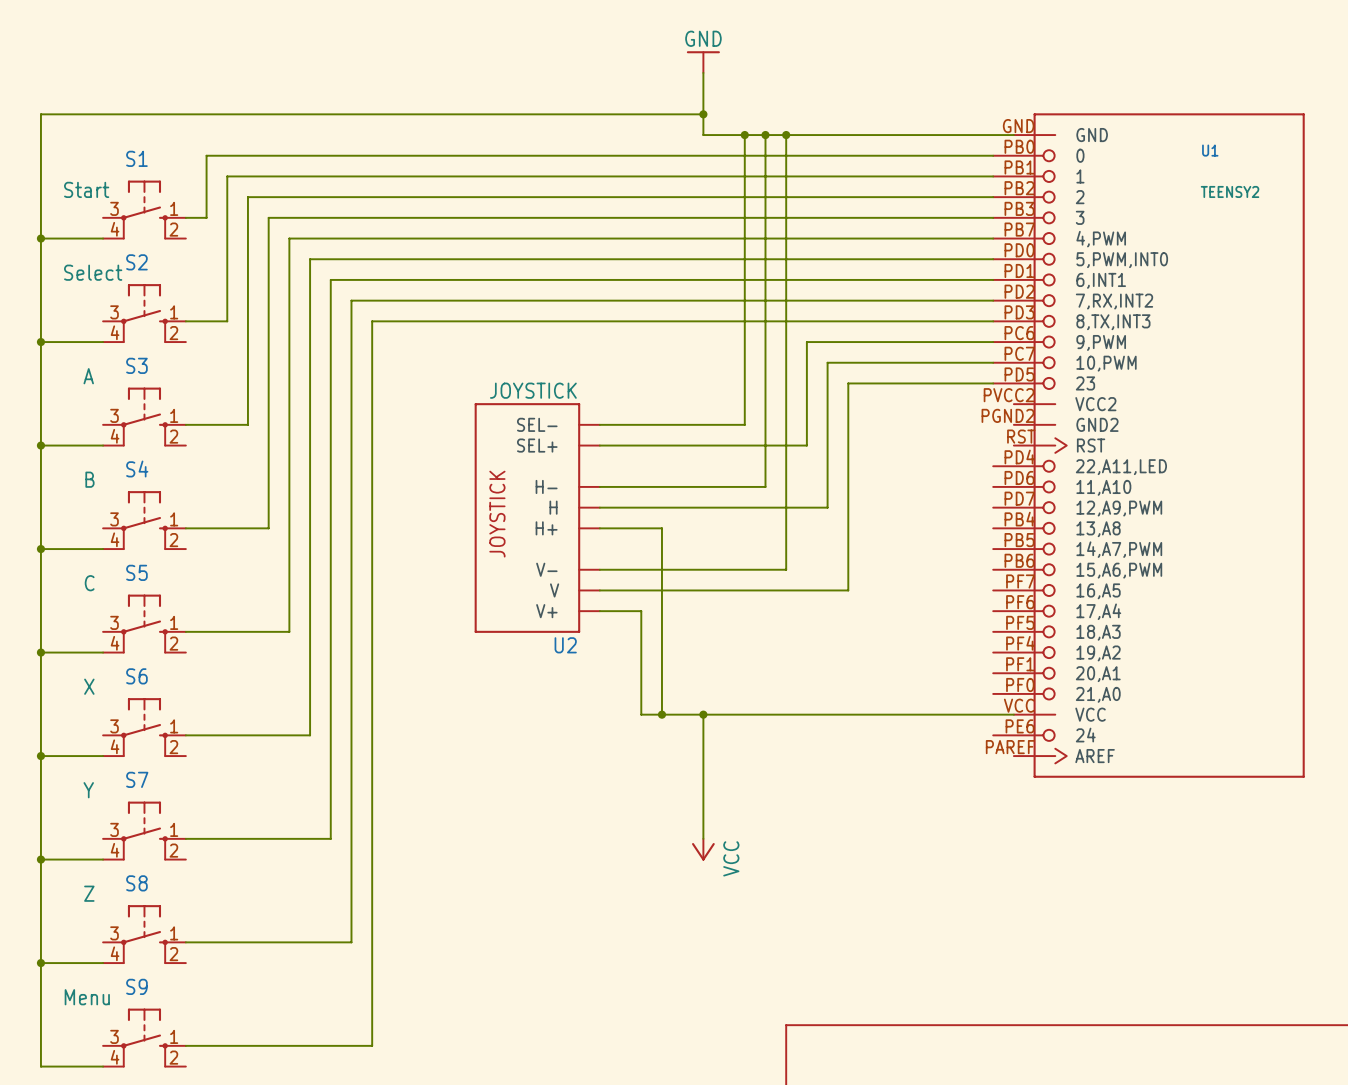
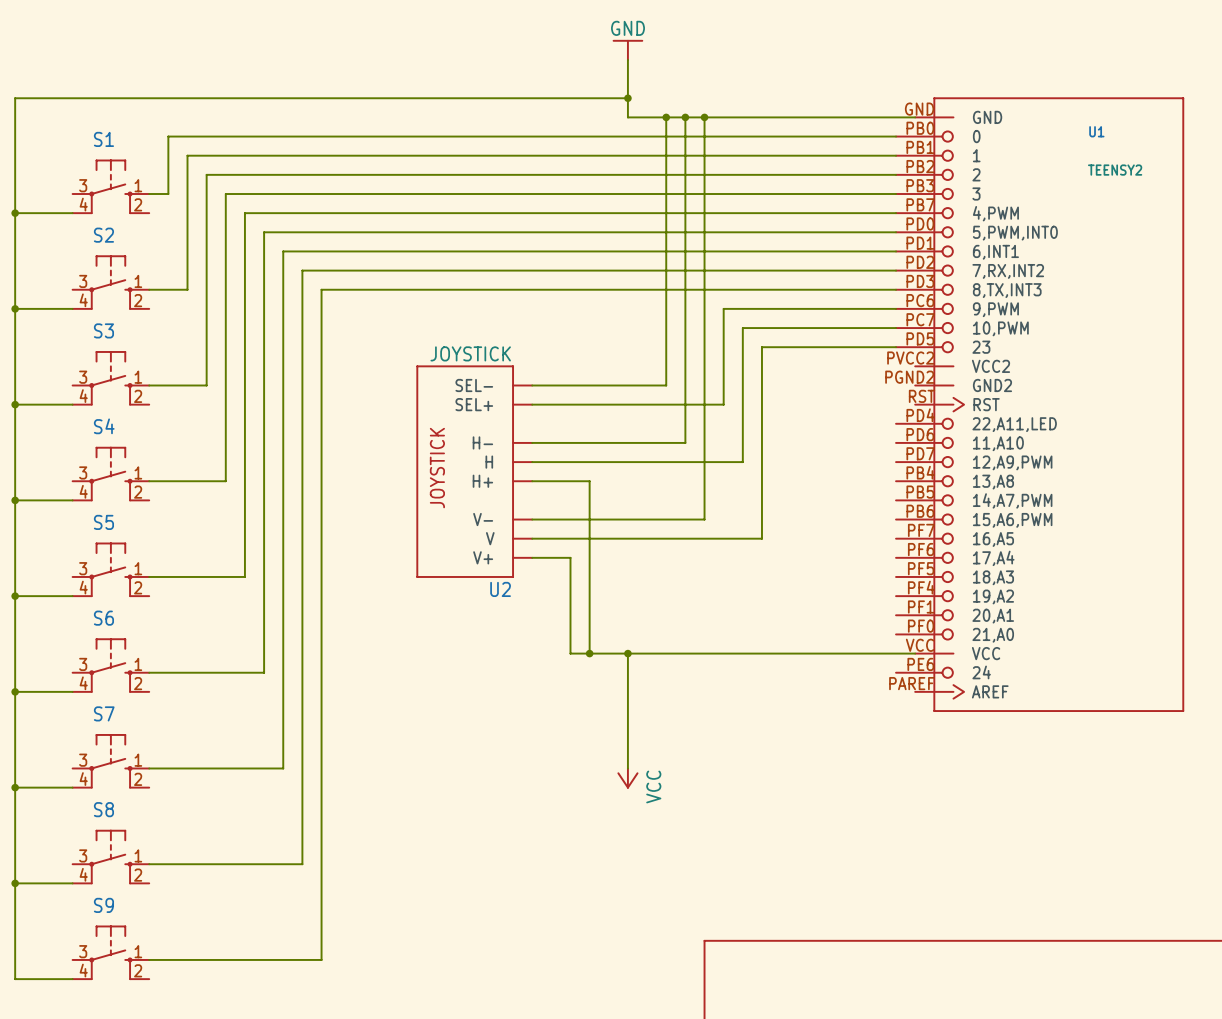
text: Start (86, 189) -> none
text: Select (93, 272) -> none
text: A (88, 376) -> none
text: B (89, 479) -> none
text: C (89, 583) -> none
text: X (89, 686) -> none
text: Y (88, 790) -> none
text: Z (89, 893) -> none
text: Menu (87, 997) -> none

